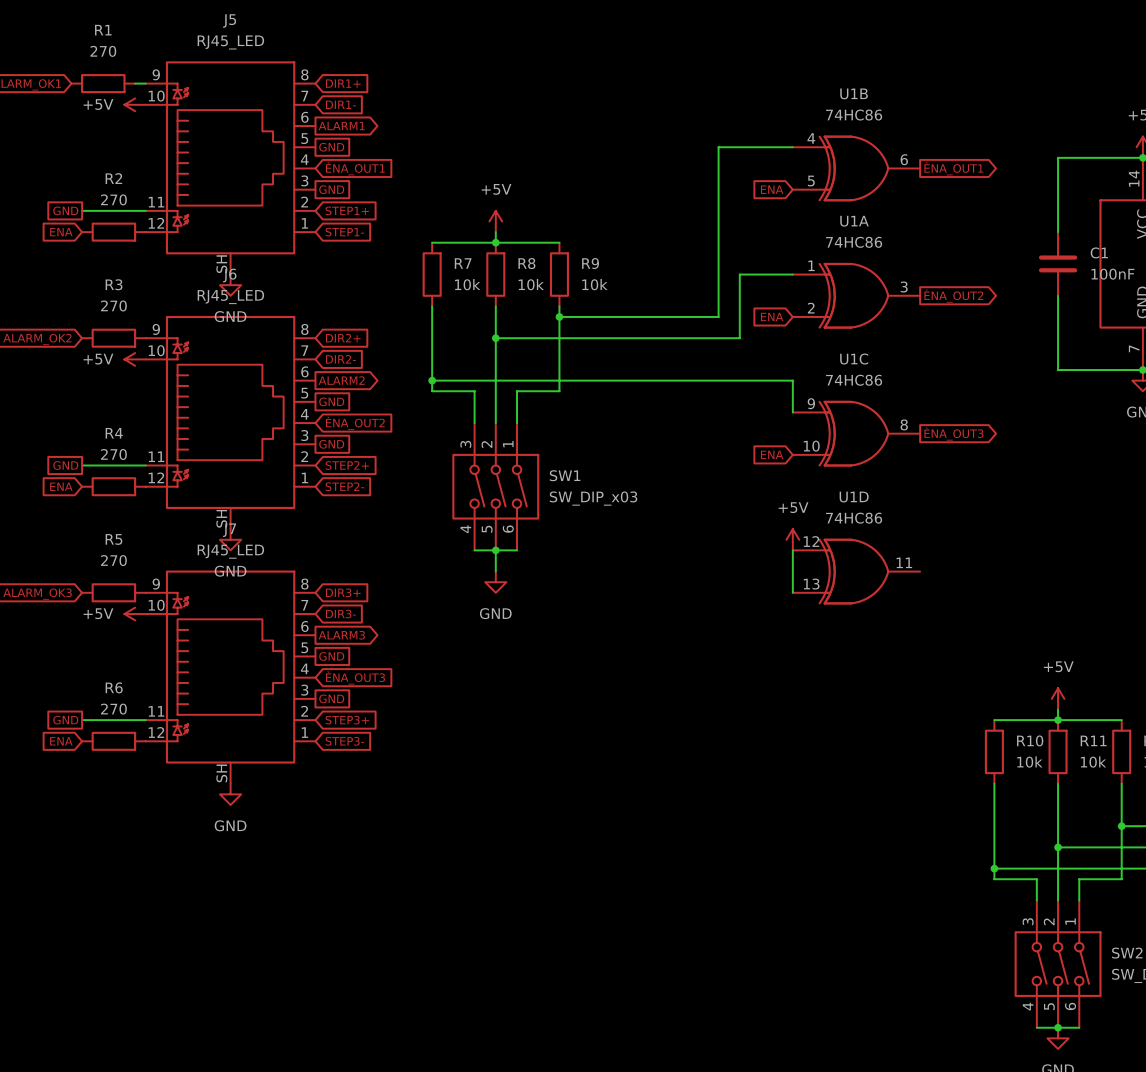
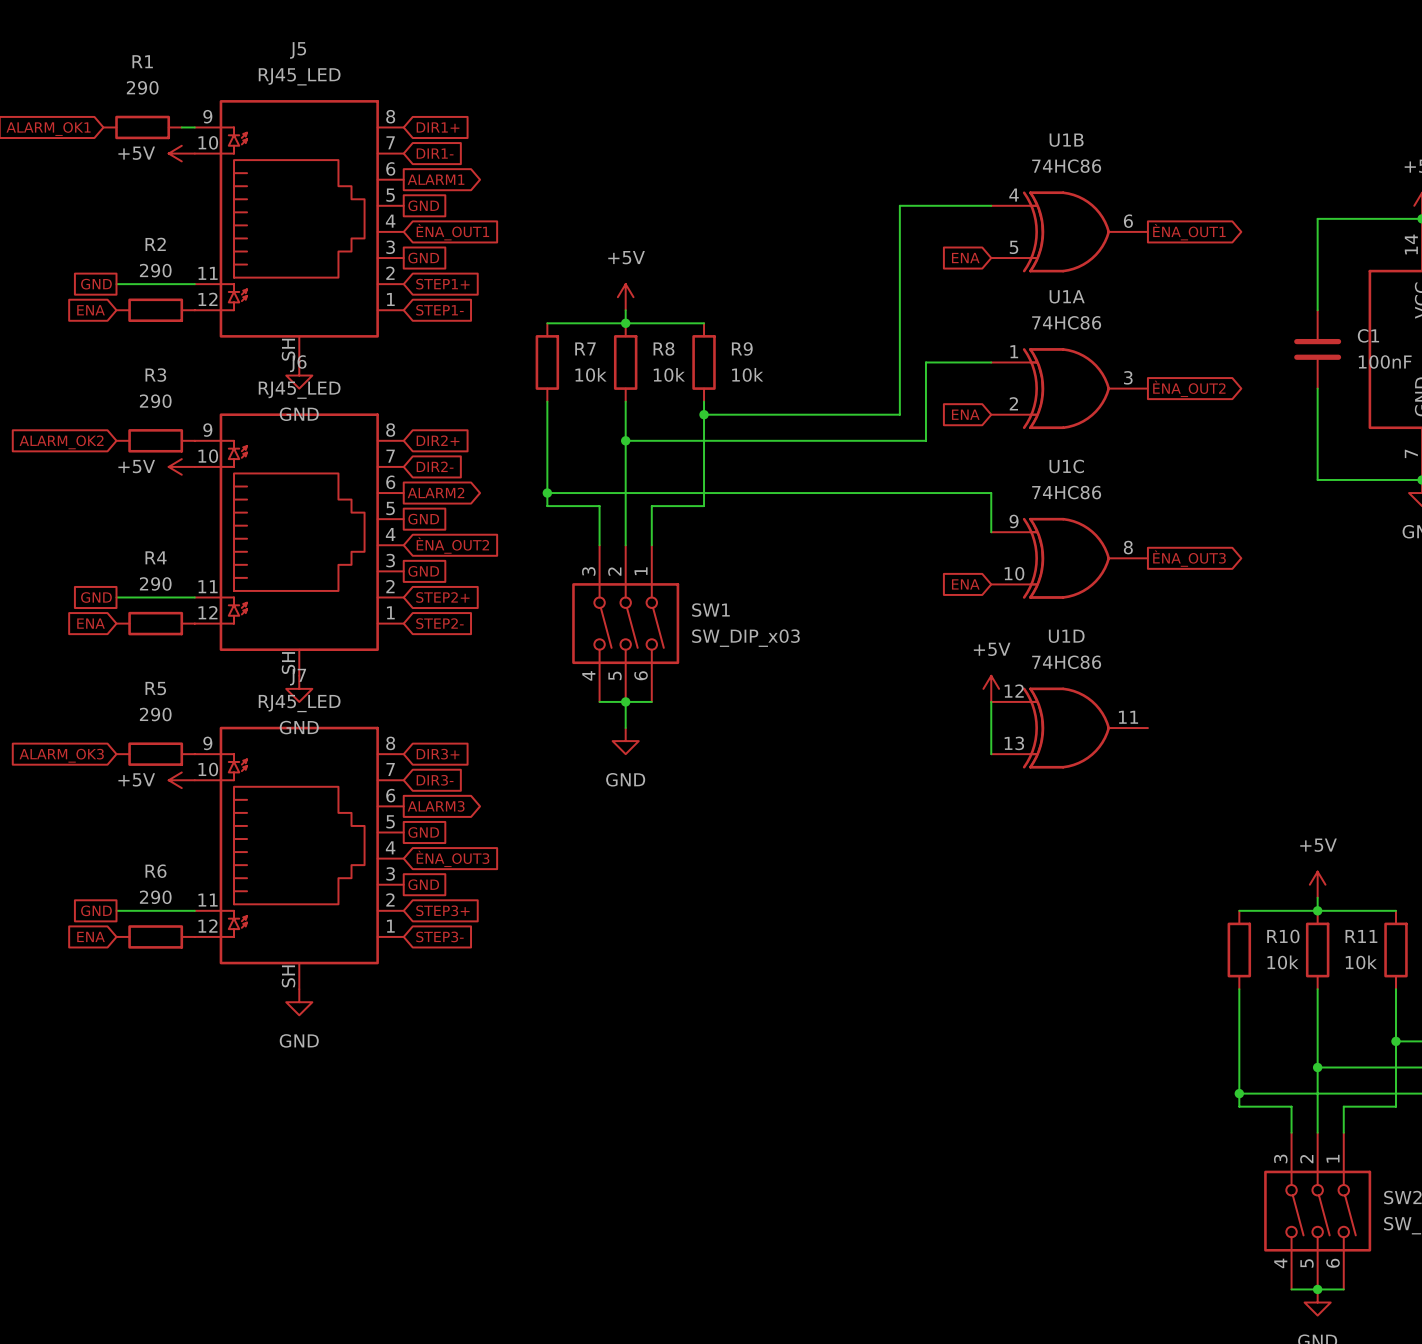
R1 value: 270 (103, 51) -> 290 (142, 87)
R2 value: 270 (113, 199) -> 290 (155, 270)
R3 value: 270 (113, 305) -> 290 (155, 401)
R4 value: 270 (113, 454) -> 290 (155, 583)
R5 value: 270 (113, 560) -> 290 (155, 714)
R6 value: 270 (113, 709) -> 290 (155, 897)

